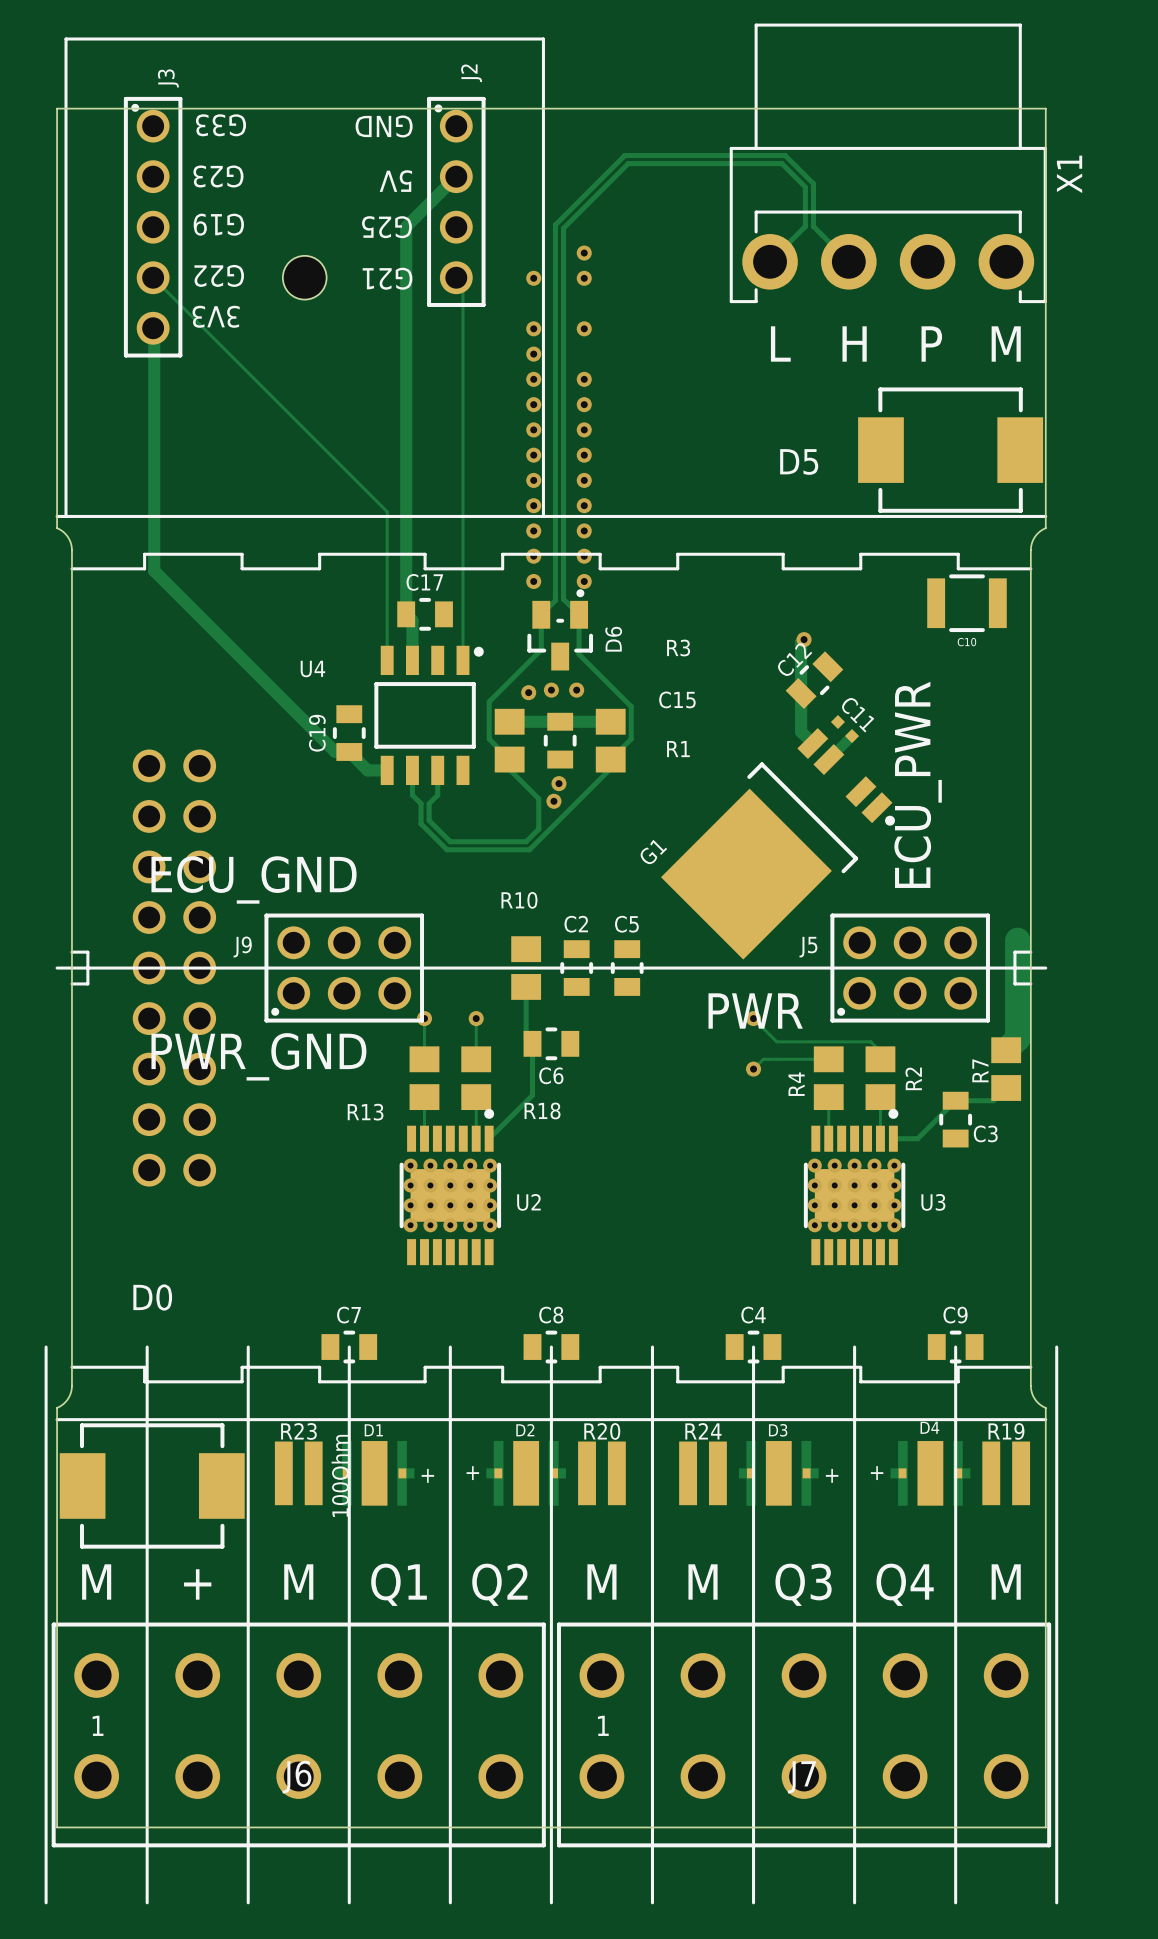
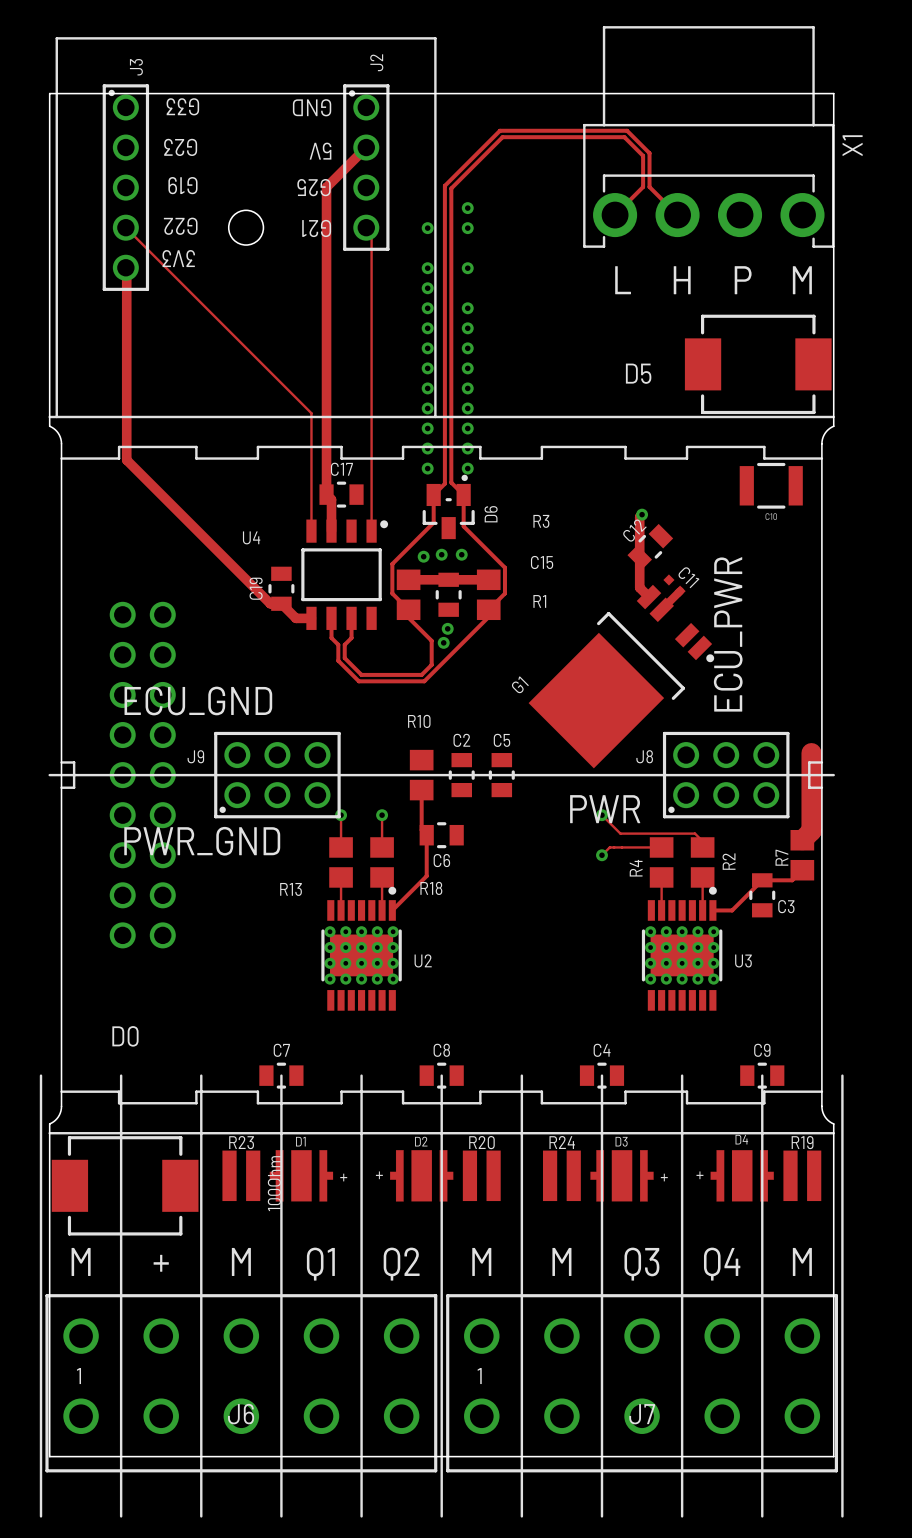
J5 name: J5 (808, 947) -> J8 (644, 756)

